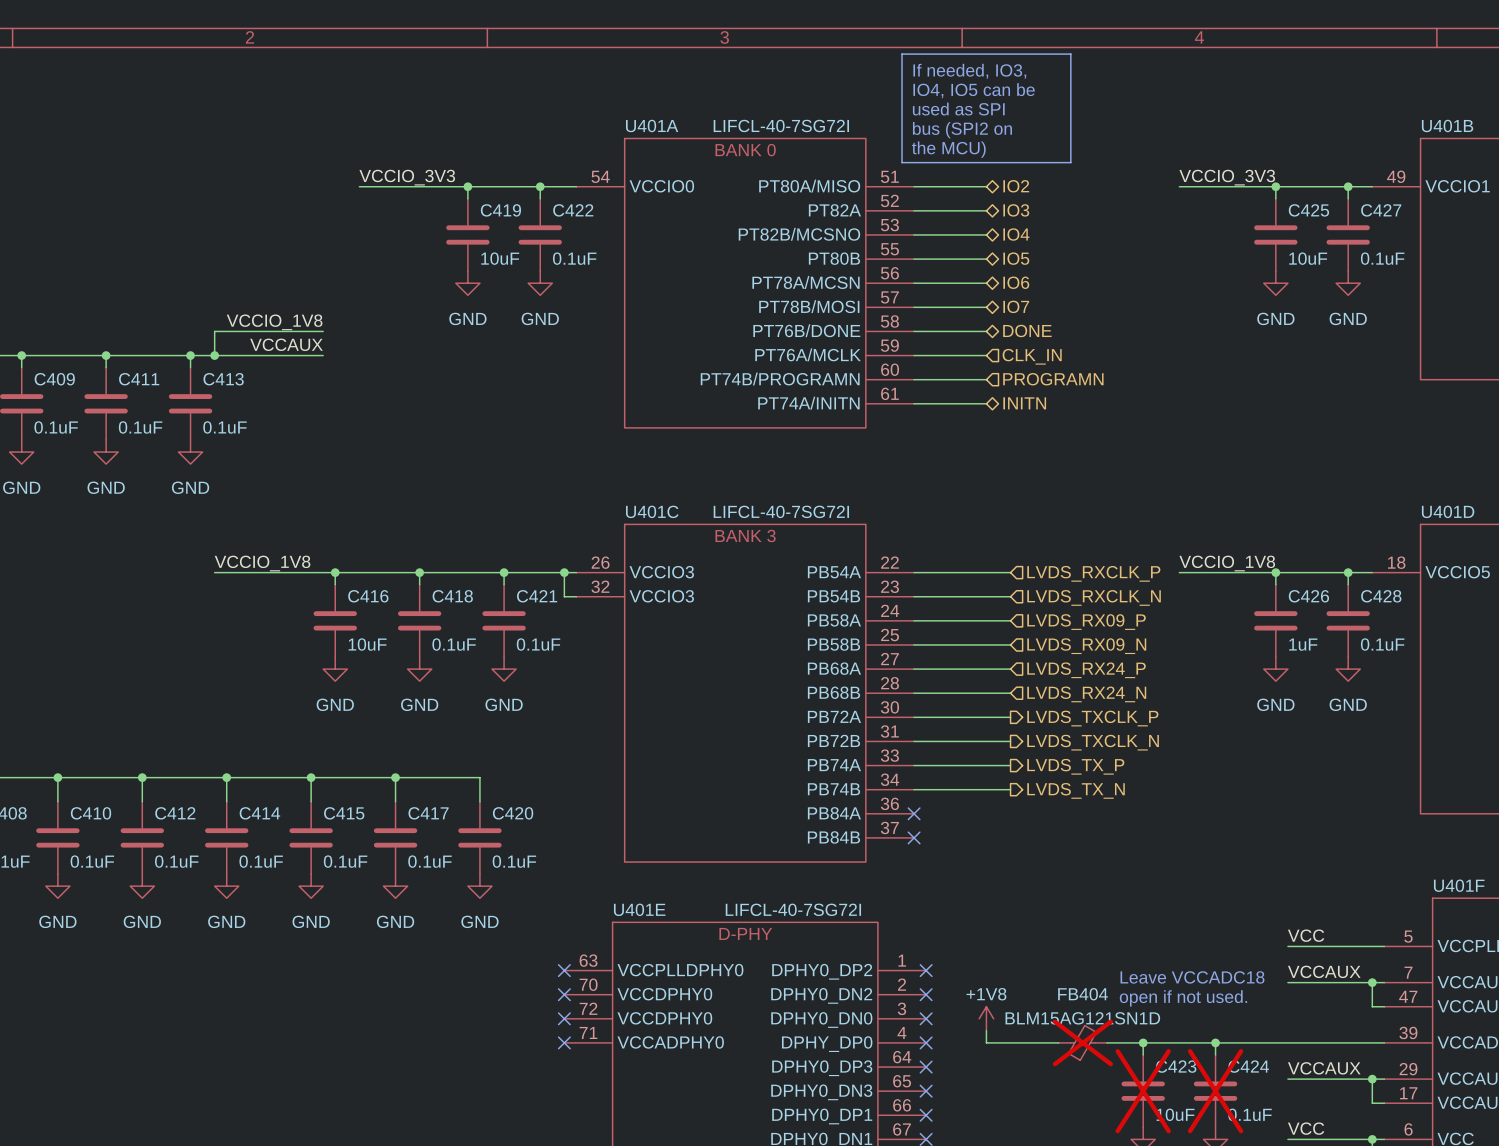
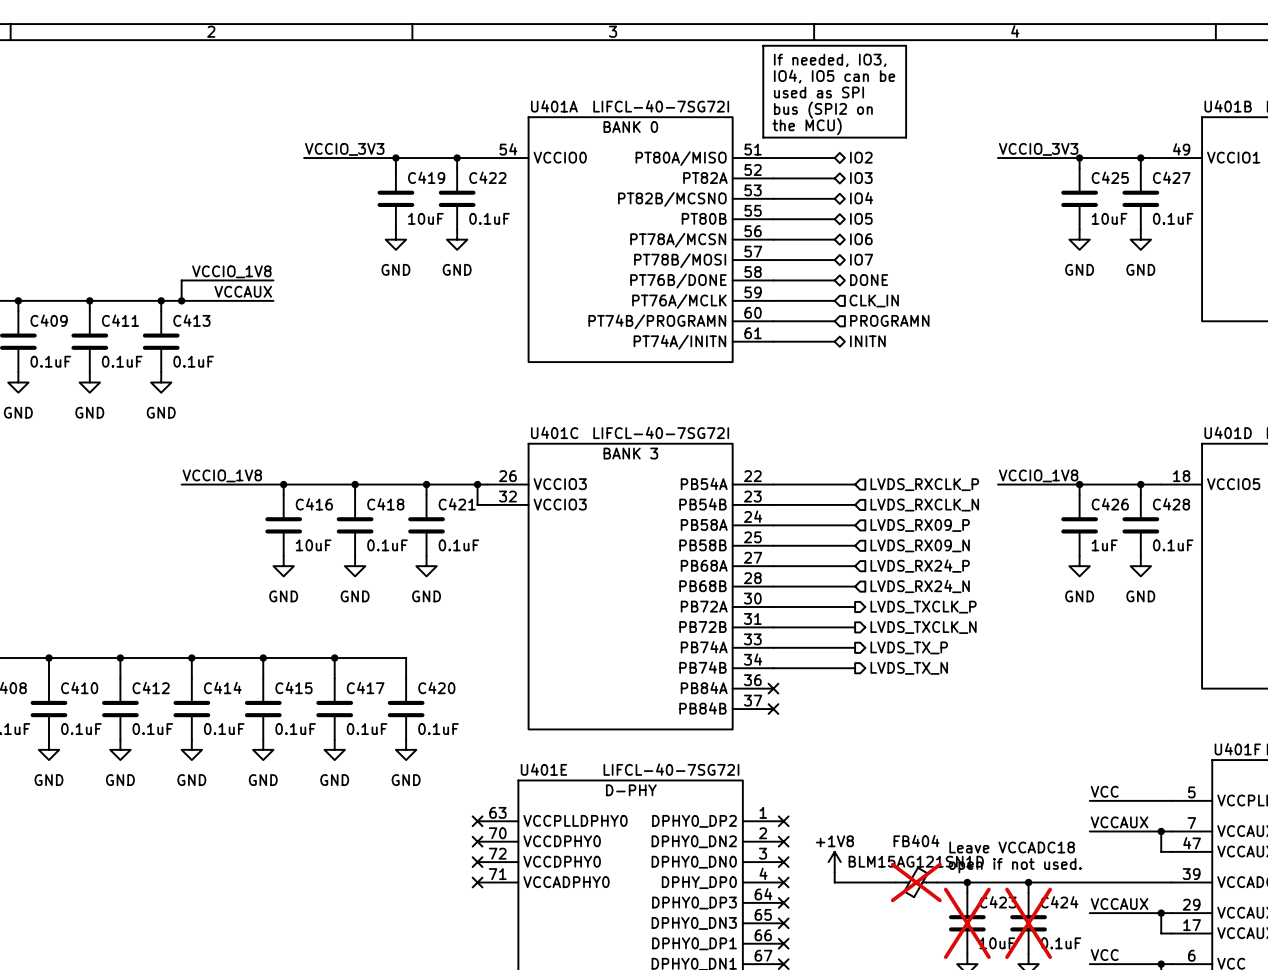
text: Leave VCCADC18 (1192, 977) -> none
text: open if not used. (1183, 998) -> Leave VCCADC18 (1012, 847)
text: none -> open if not used. (1015, 865)

